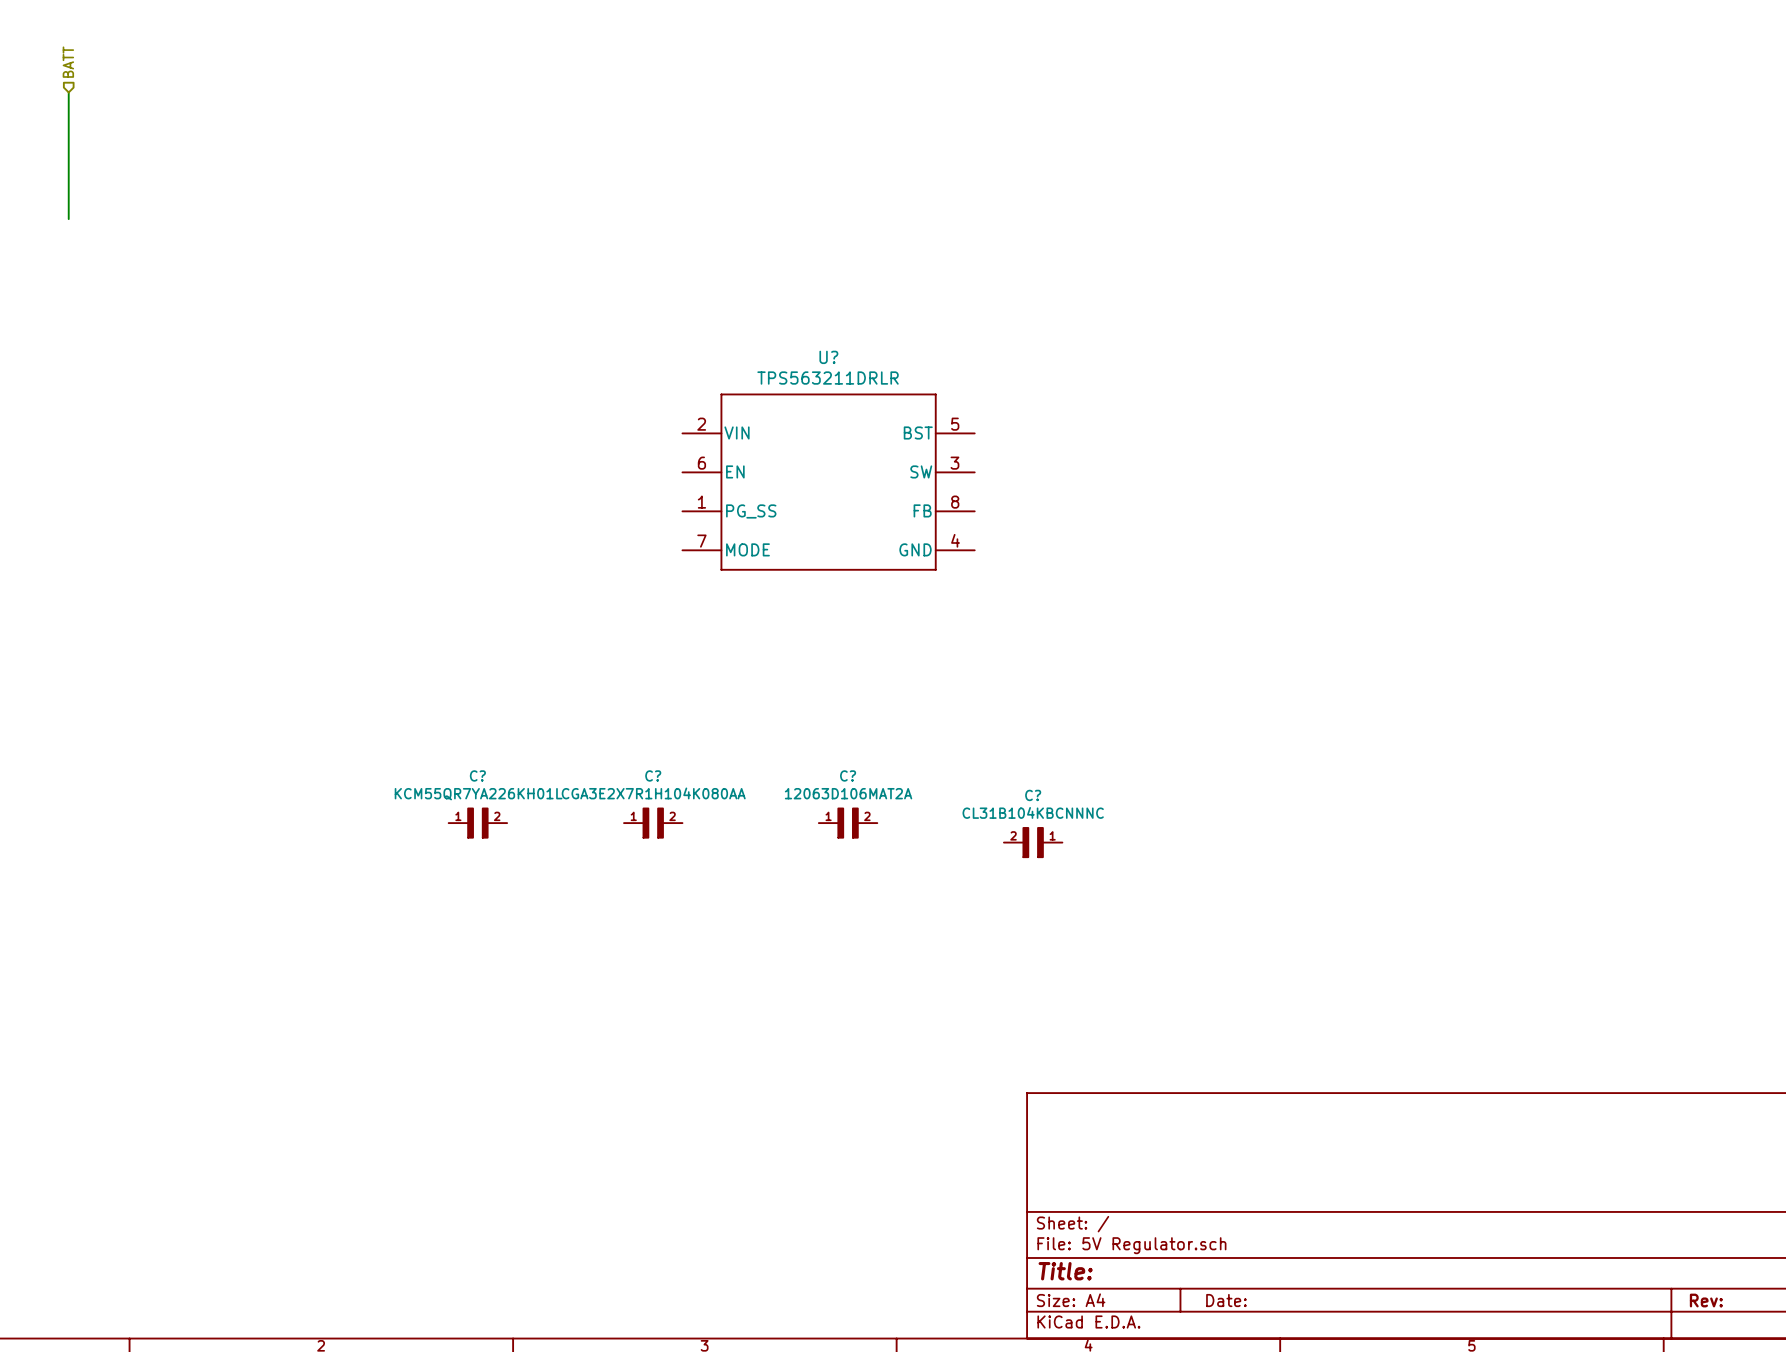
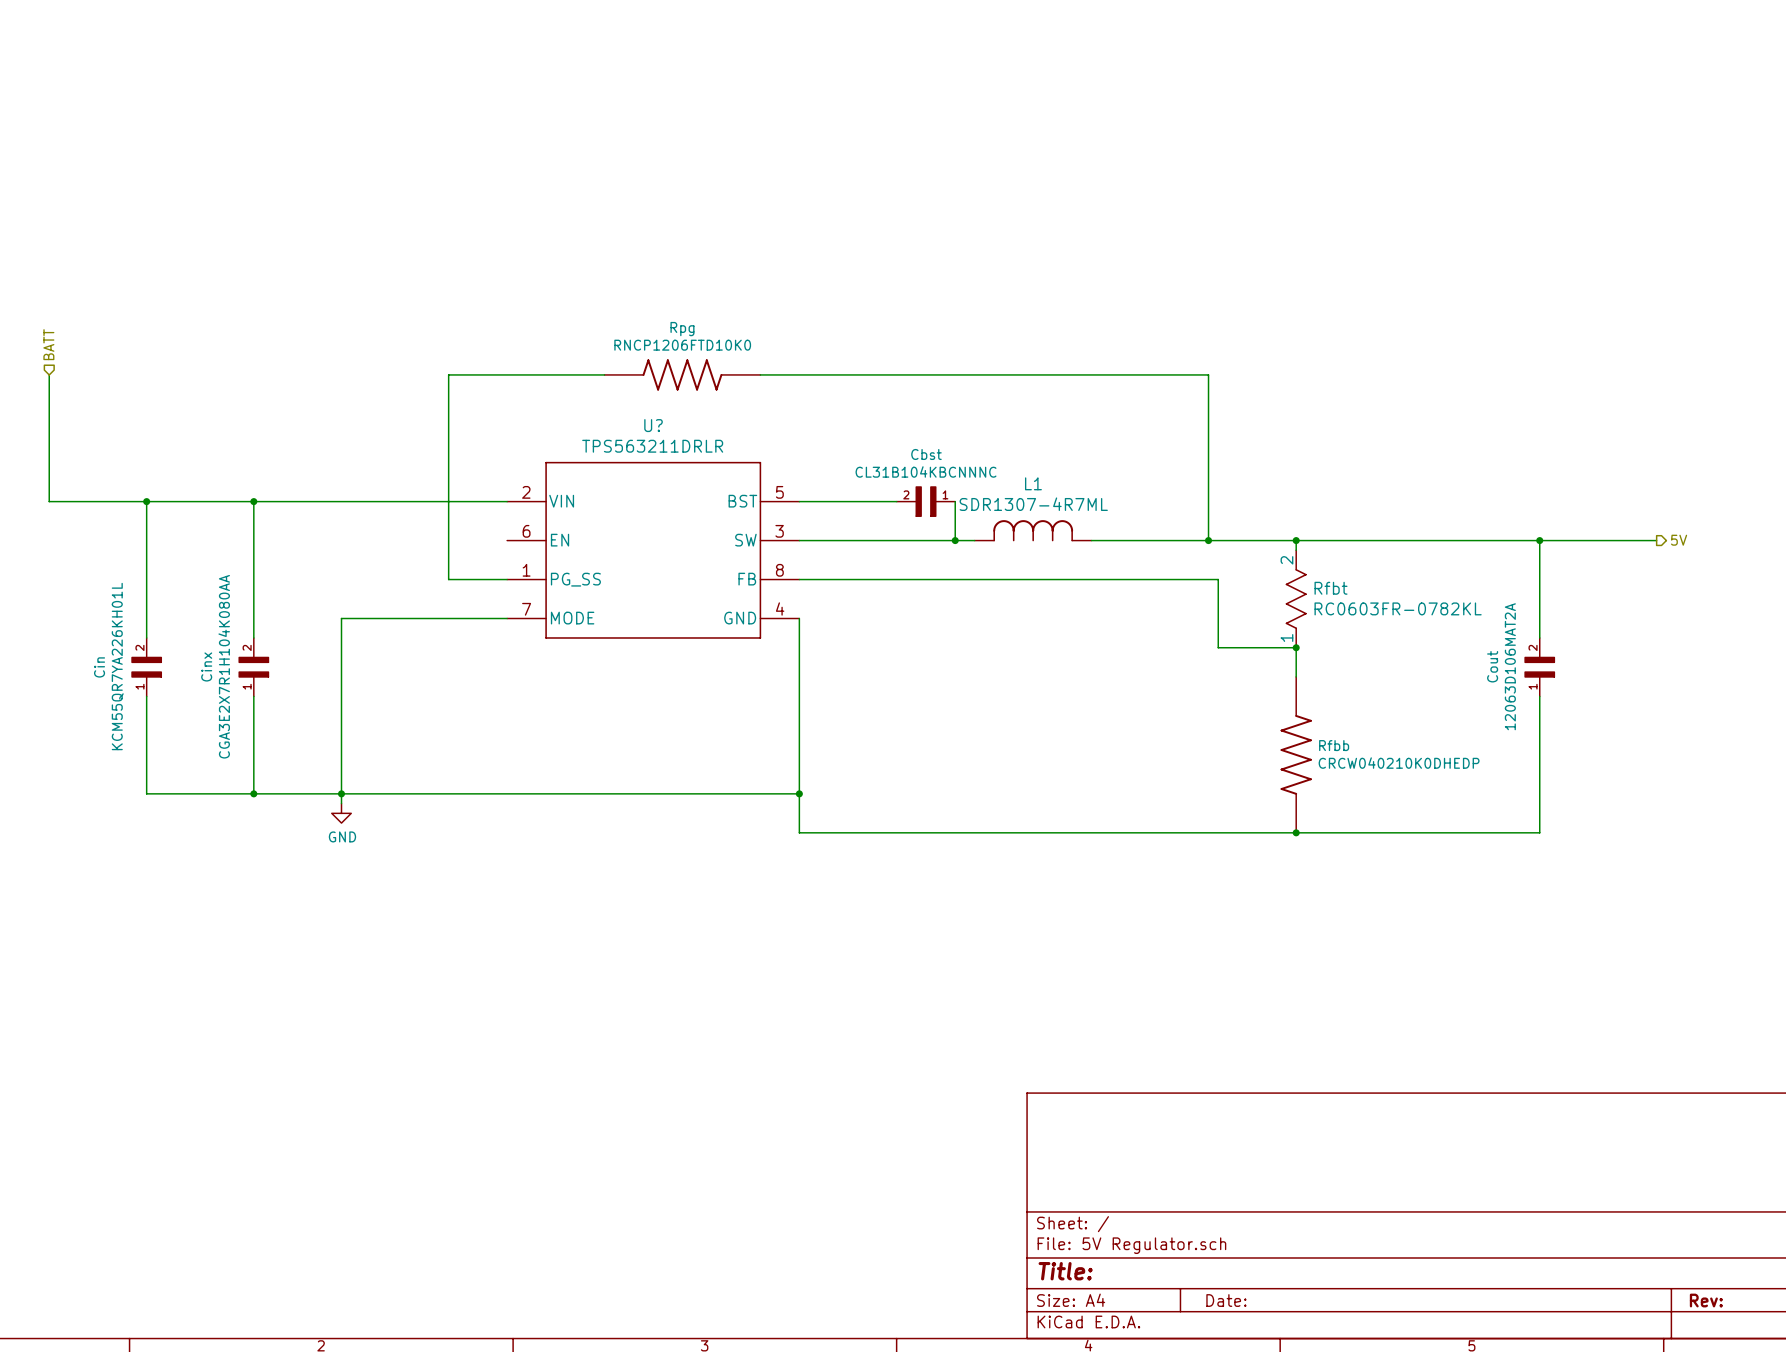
hierarchical label: BATT (68, 62) -> none
wire: (68, 92) (68, 219) -> none
hierarchical label: none -> BATT (48, 344)
wire: none -> (49, 374) (49, 501) (507, 501)
wire: none -> (604, 374) (448, 374) (448, 579) (507, 579)
Rpg: none -> RNCP1206FTD10K0 (682, 374)
wire: none -> (760, 374) (1208, 374) (1208, 540)
U? position: (828, 482) -> (653, 550)
wire: none -> (146, 501) (146, 637)
junction: none -> (146, 501)
wire: none -> (253, 501) (253, 637)
junction: none -> (253, 501)
wire: none -> (799, 501) (896, 501)
Cbst: none -> CL31B104KBCNNNC (926, 501)
wire: none -> (955, 501) (955, 540)
L1: none -> SDR1307-4R7ML (1033, 530)
wire: none -> (799, 540) (974, 540)
junction: none -> (955, 540)
wire: none -> (1091, 540) (1656, 540)
junction: none -> (1208, 540)
wire: none -> (1296, 540) (1296, 550)
junction: none -> (1296, 540)
wire: none -> (1539, 540) (1539, 637)
junction: none -> (1539, 540)
hierarchical label: none -> 5V (1679, 540)
wire: none -> (799, 579) (1218, 579) (1218, 647) (1296, 647) (1296, 676)
Rfbt: none -> RC0603FR-0782KL (1296, 599)
wire: none -> (507, 618) (341, 618) (341, 803)
wire: none -> (799, 618) (799, 832) (1539, 832) (1539, 696)
junction: none -> (1296, 647)
Cin: none -> KCM55QR7YA226KH01L (146, 667)
Cinx: none -> CGA3E2X7R1H104K080AA (253, 667)
Cout: none -> 12063D106MAT2A (1539, 667)
wire: none -> (146, 696) (146, 793) (799, 793)
wire: none -> (253, 696) (253, 793)
Rfbb: none -> CRCW040210K0DHEDP (1296, 754)
junction: none -> (253, 793)
junction: none -> (341, 793)
junction: none -> (799, 793)
power symbol: none -> GND (341, 813)
C?: KCM55QR7YA226KH01L (477, 823) -> none
C?: CGA3E2X7R1H104K080AA (653, 823) -> none
C?: 12063D106MAT2A (848, 823) -> none
junction: none -> (1296, 832)
C?: CL31B104KBCNNNC (1033, 842) -> none

